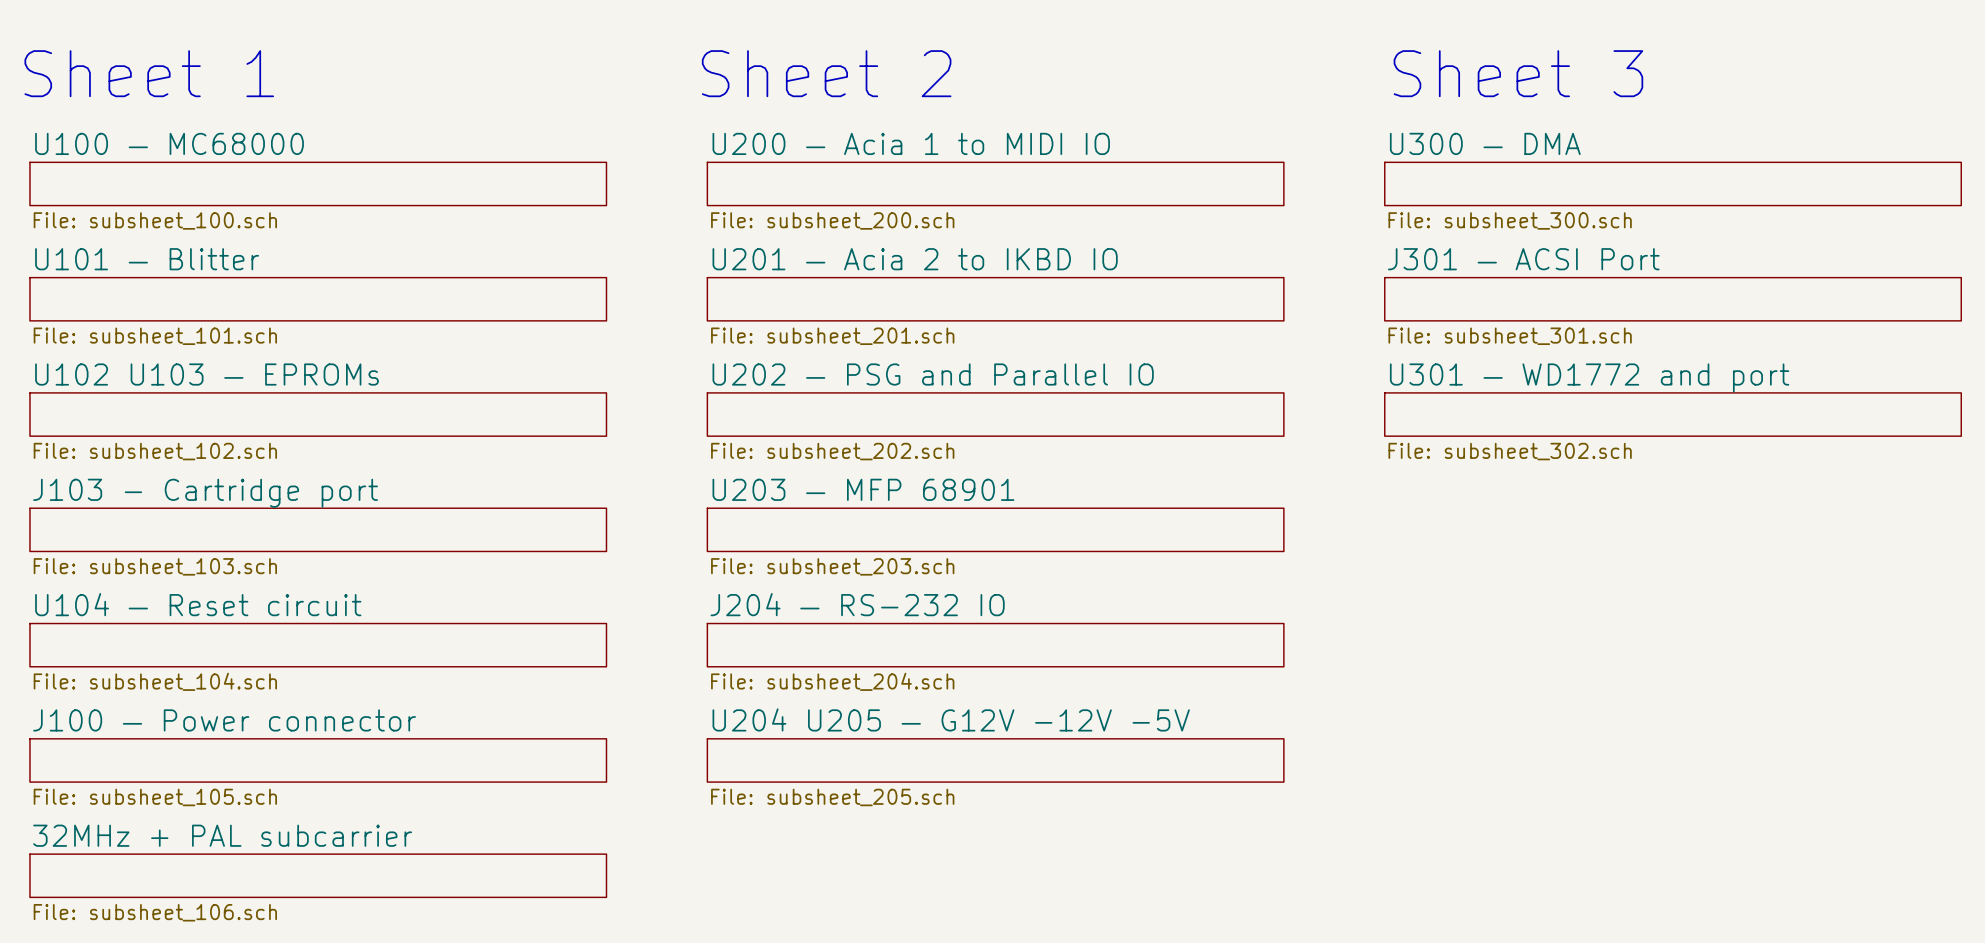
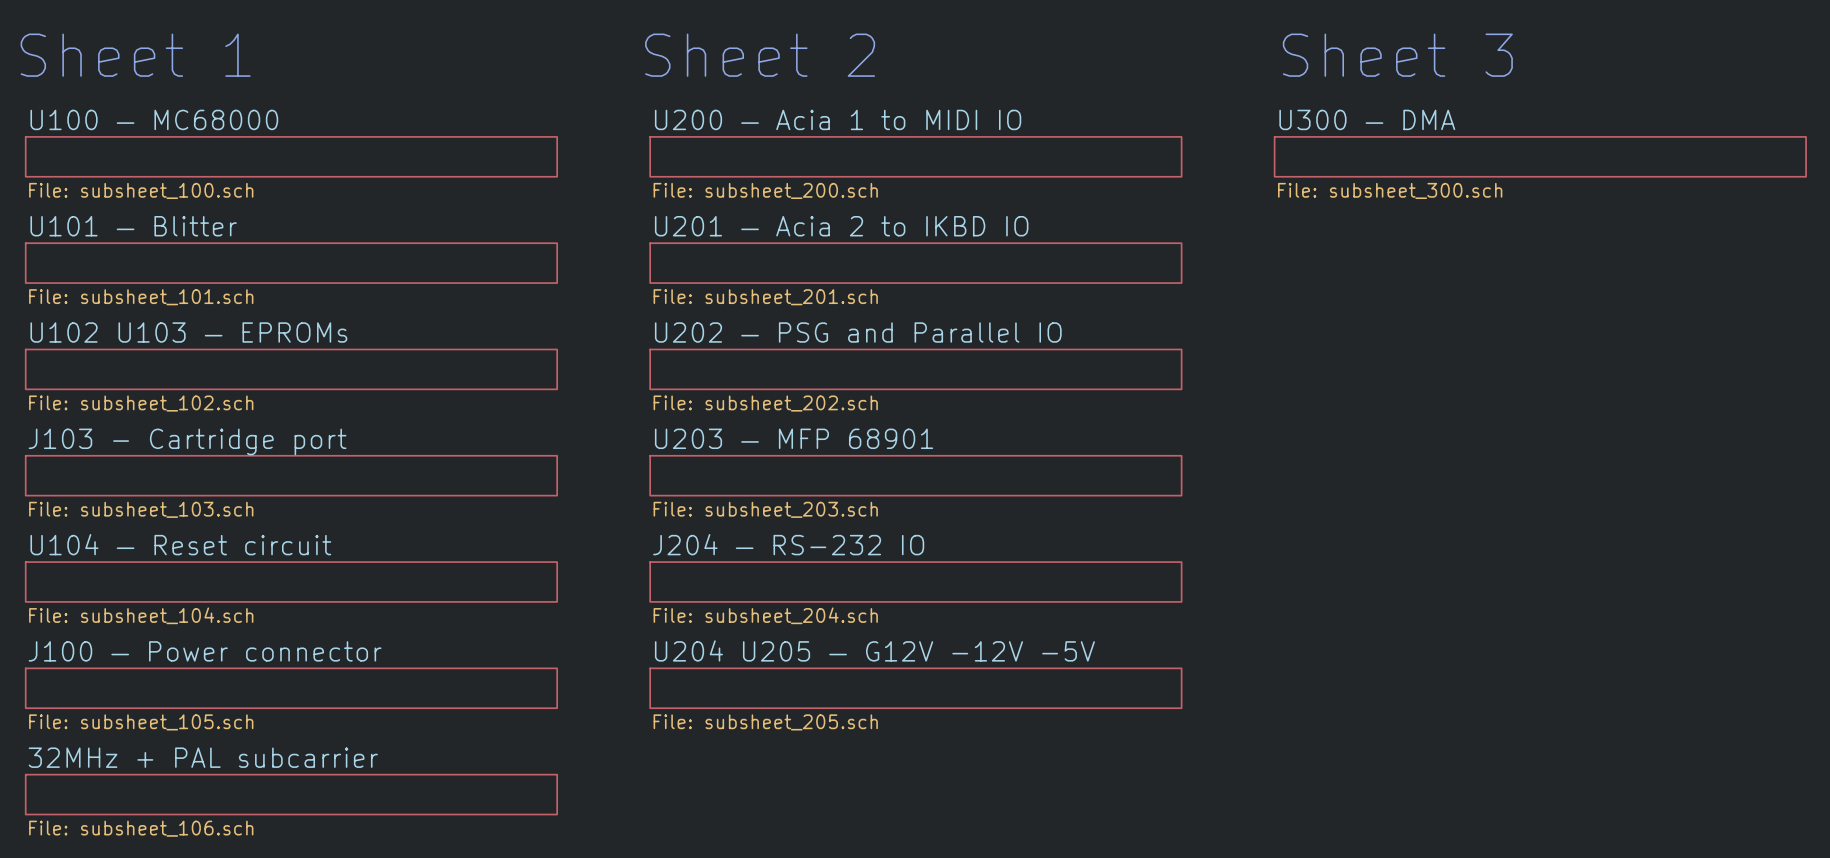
sheet J301 — ACSI Port: File: subsheet_301.sch (1673, 299) -> none
sheet U301 — WD1772 and port: File: subsheet_302.sch (1673, 414) -> none

